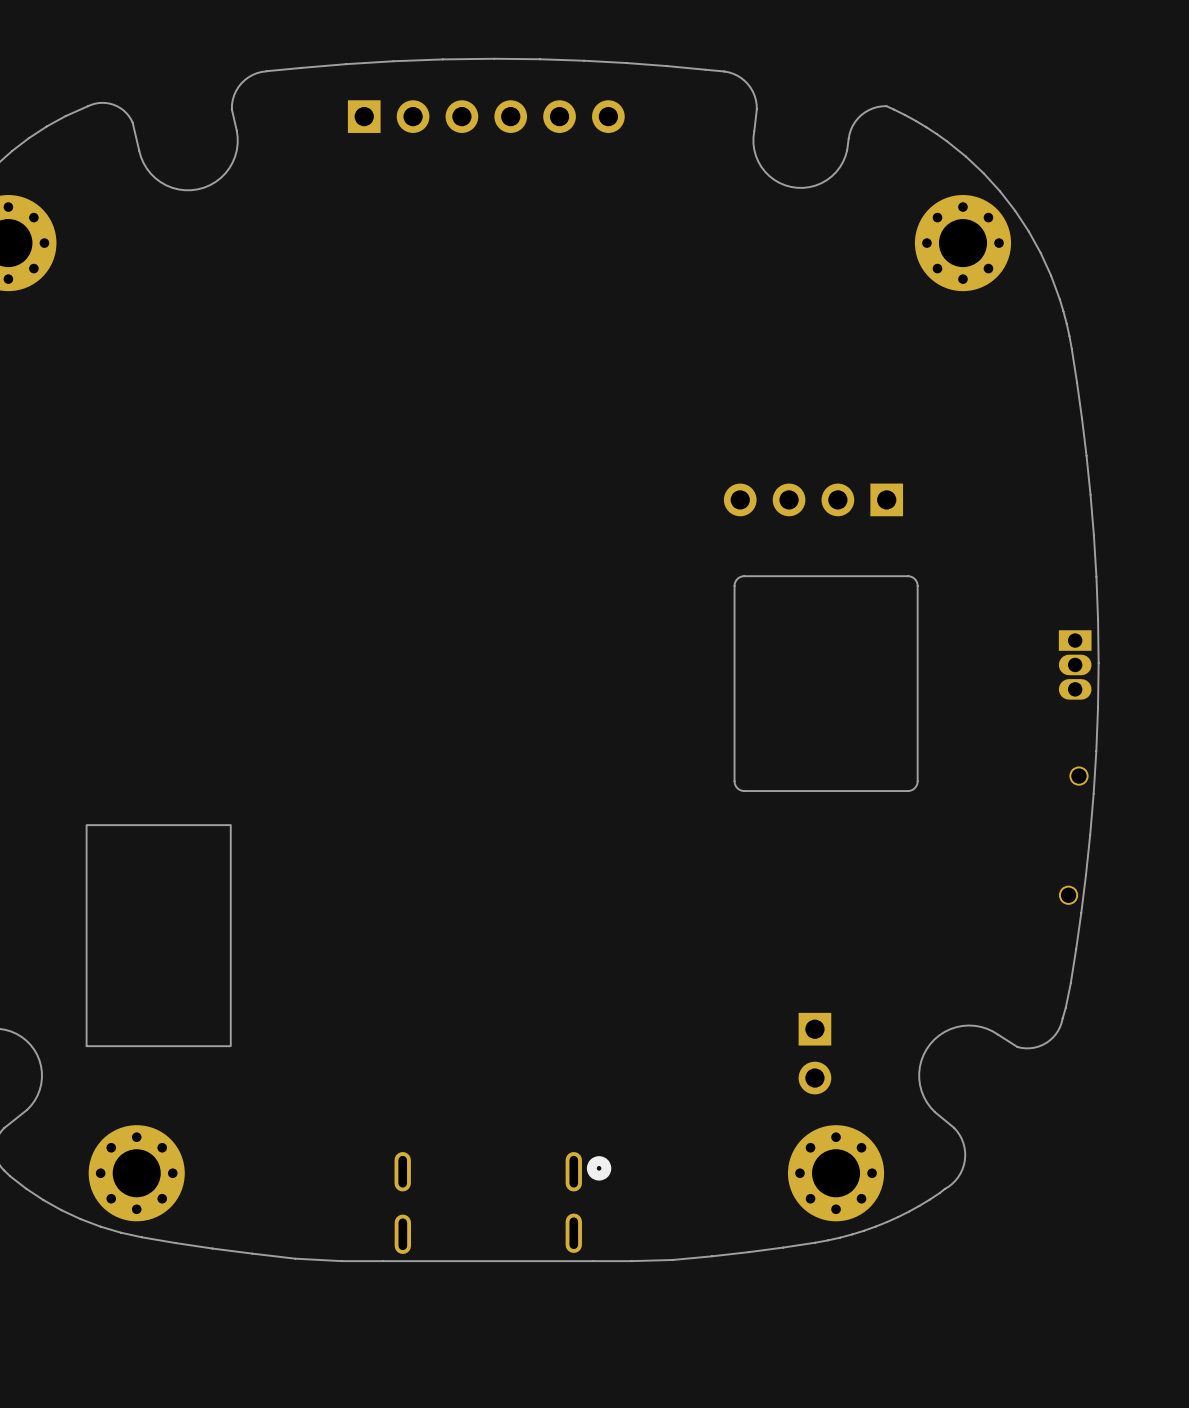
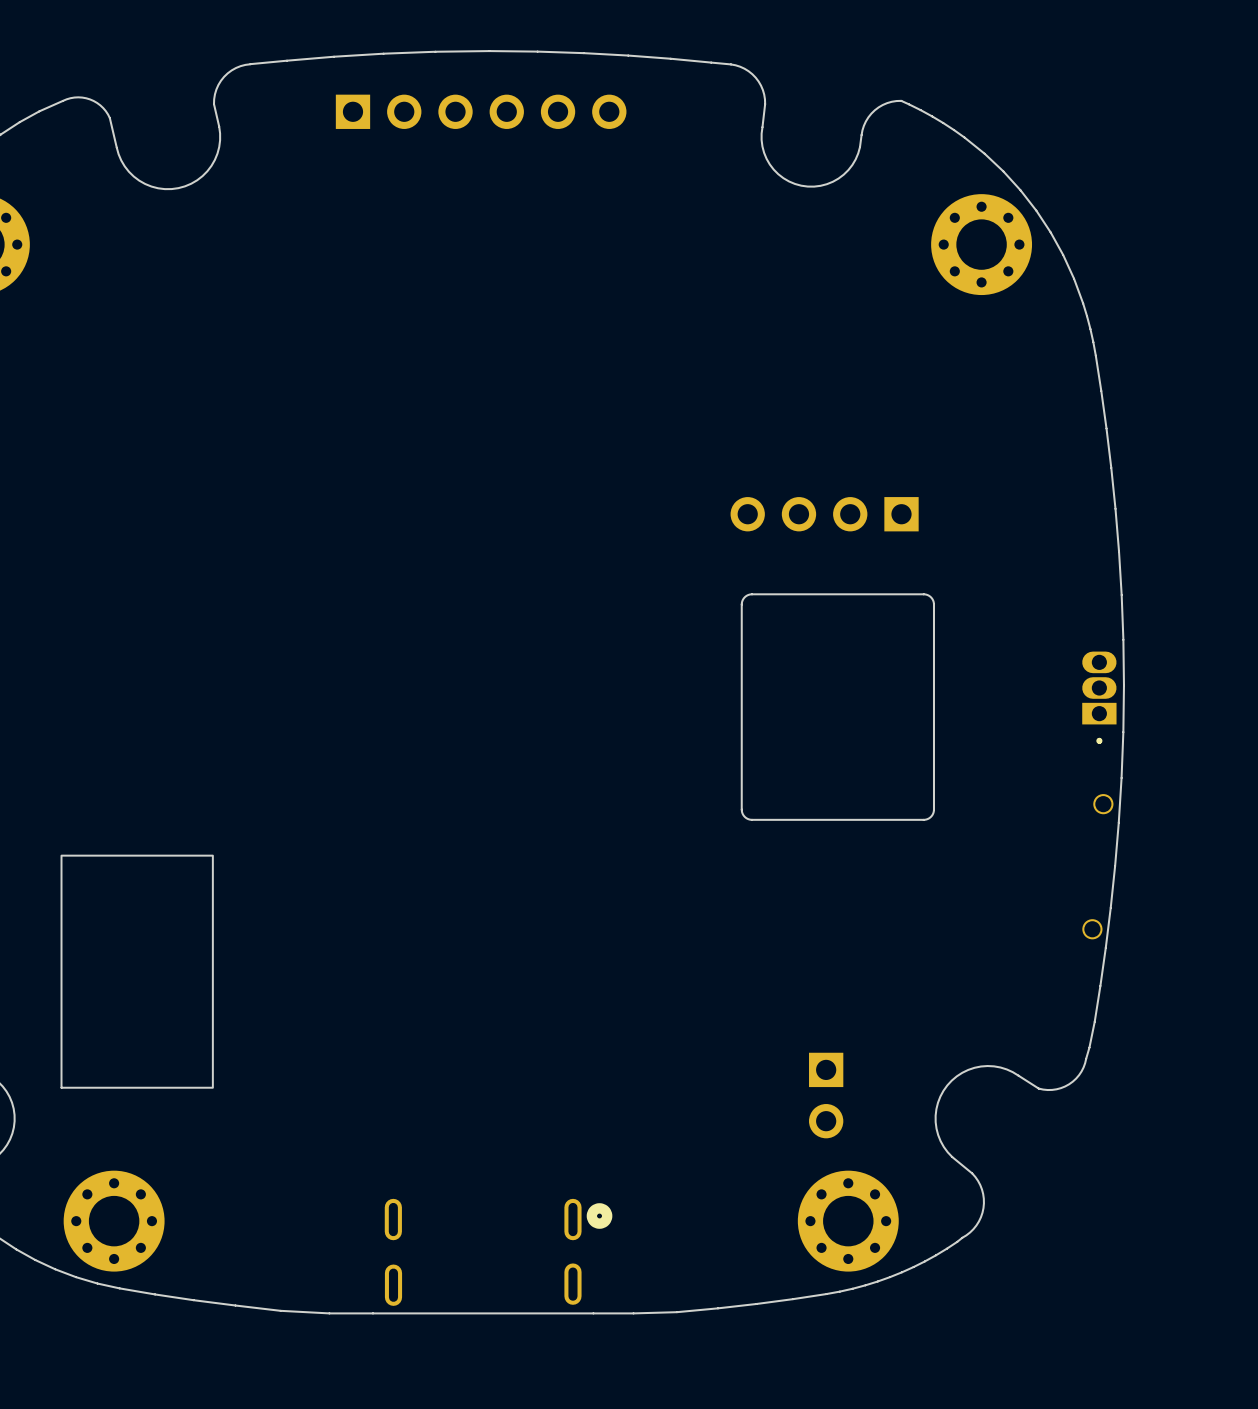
part side: top (1075, 664) -> bottom (1099, 697)

